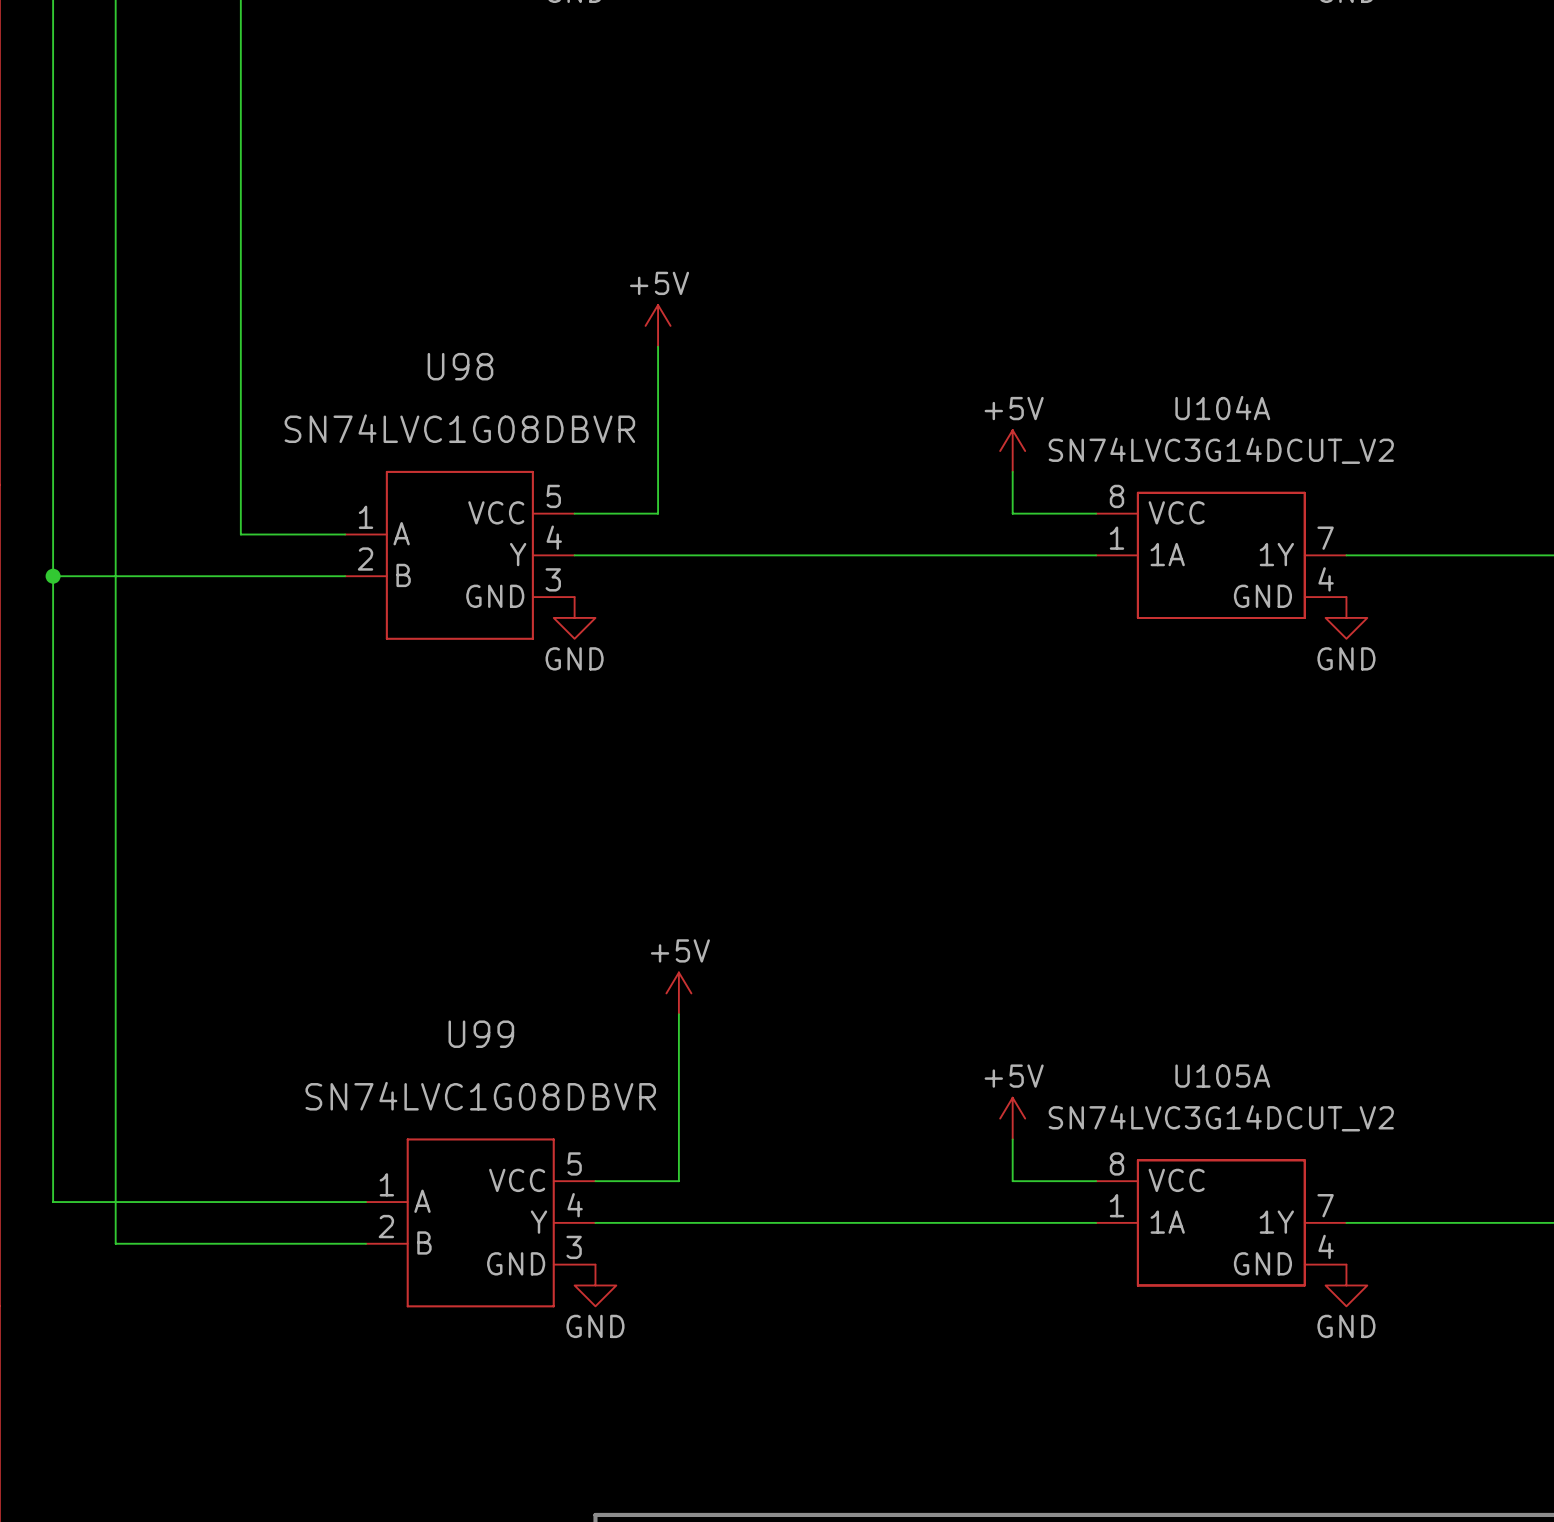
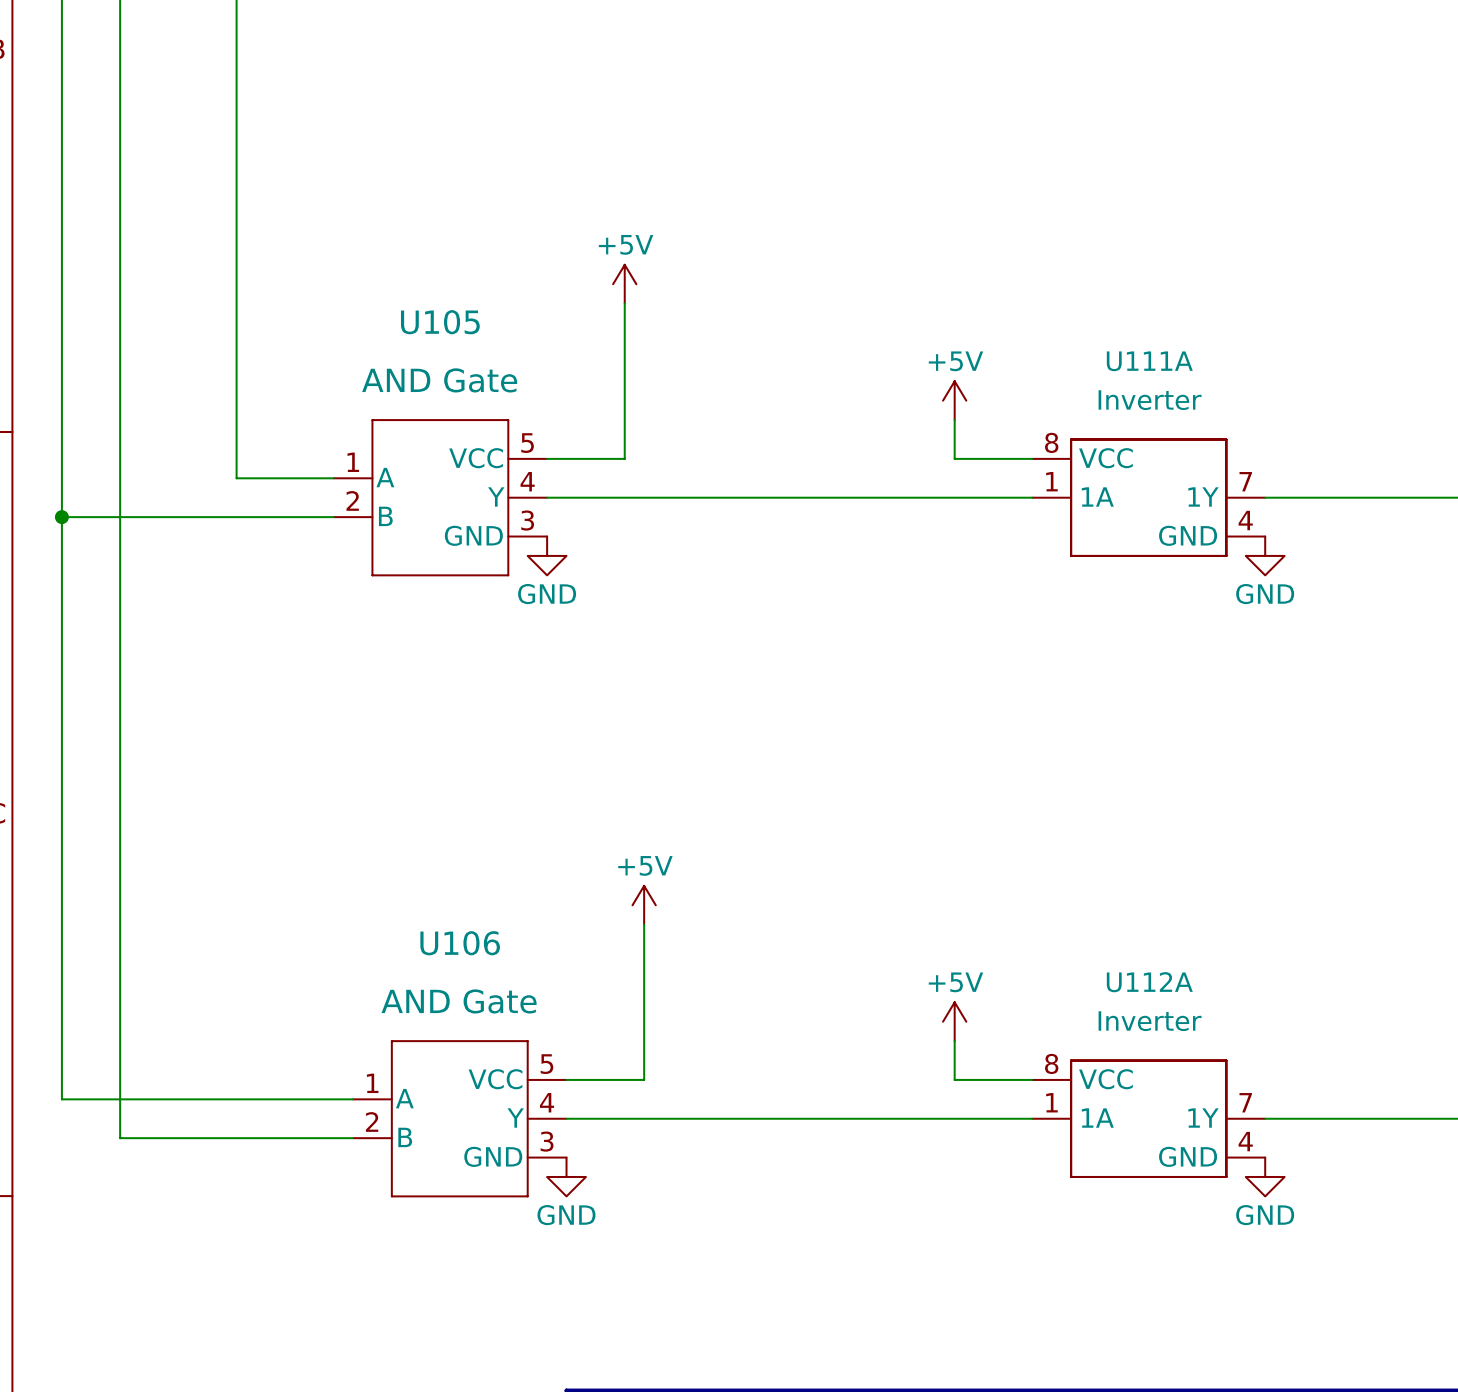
U98 name: U98 (460, 366) -> U105 (440, 322)
U104A name: U104A (1222, 408) -> U111A (1149, 361)
U98 value: SN74LVC1G08DBVR (459, 428) -> AND Gate (439, 380)
U104A value: SN74LVC3G14DCUT_V2 (1221, 450) -> Inverter (1150, 400)
U99 name: U99 (481, 1034) -> U106 (460, 943)
U105A name: U105A (1222, 1076) -> U112A (1149, 982)
U99 value: SN74LVC1G08DBVR (480, 1096) -> AND Gate (459, 1001)
U105A value: SN74LVC3G14DCUT_V2 (1221, 1118) -> Inverter (1150, 1021)

